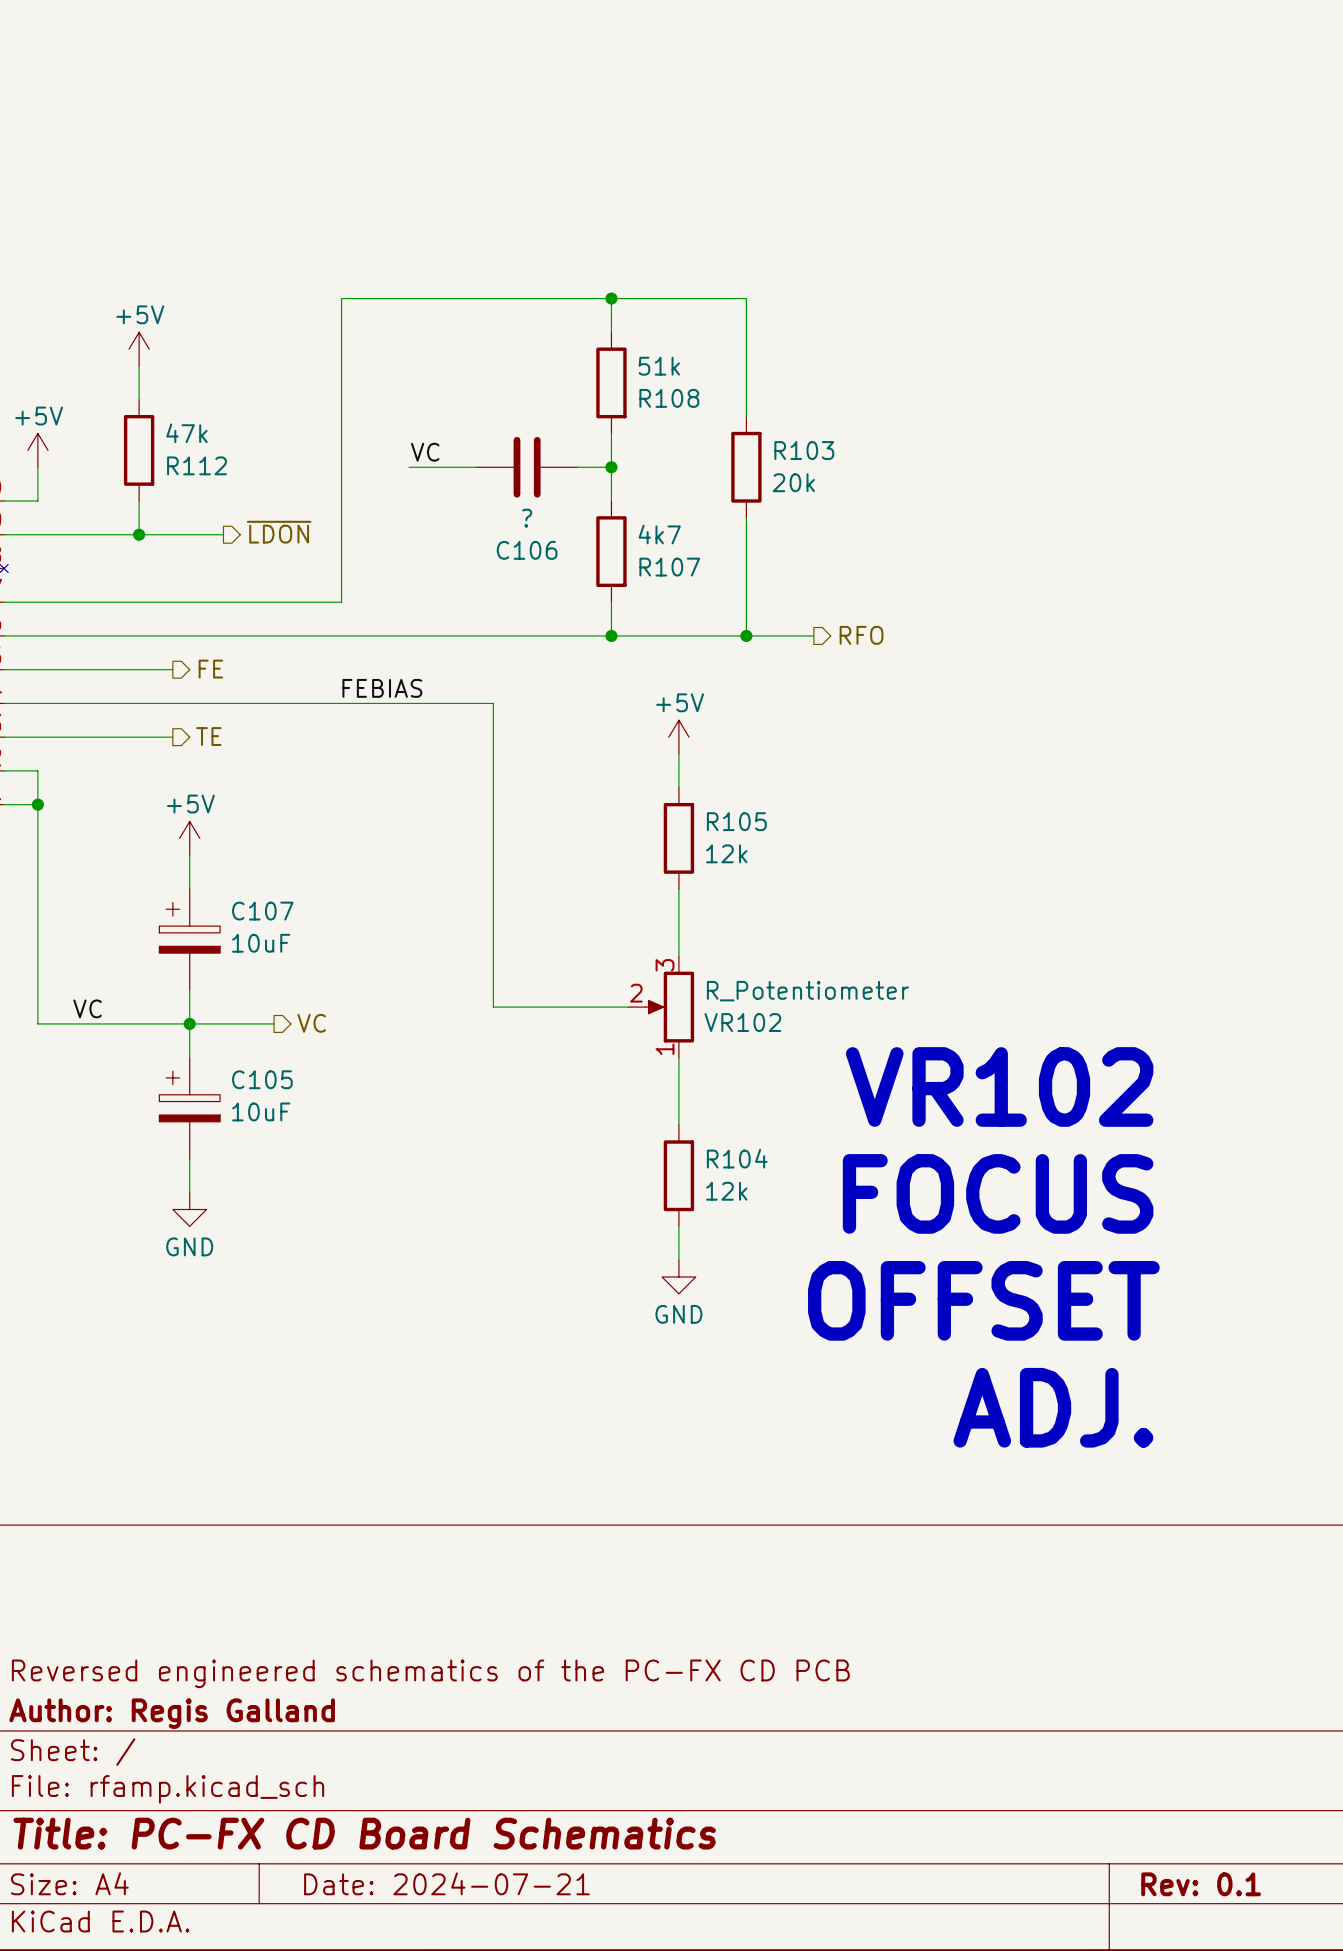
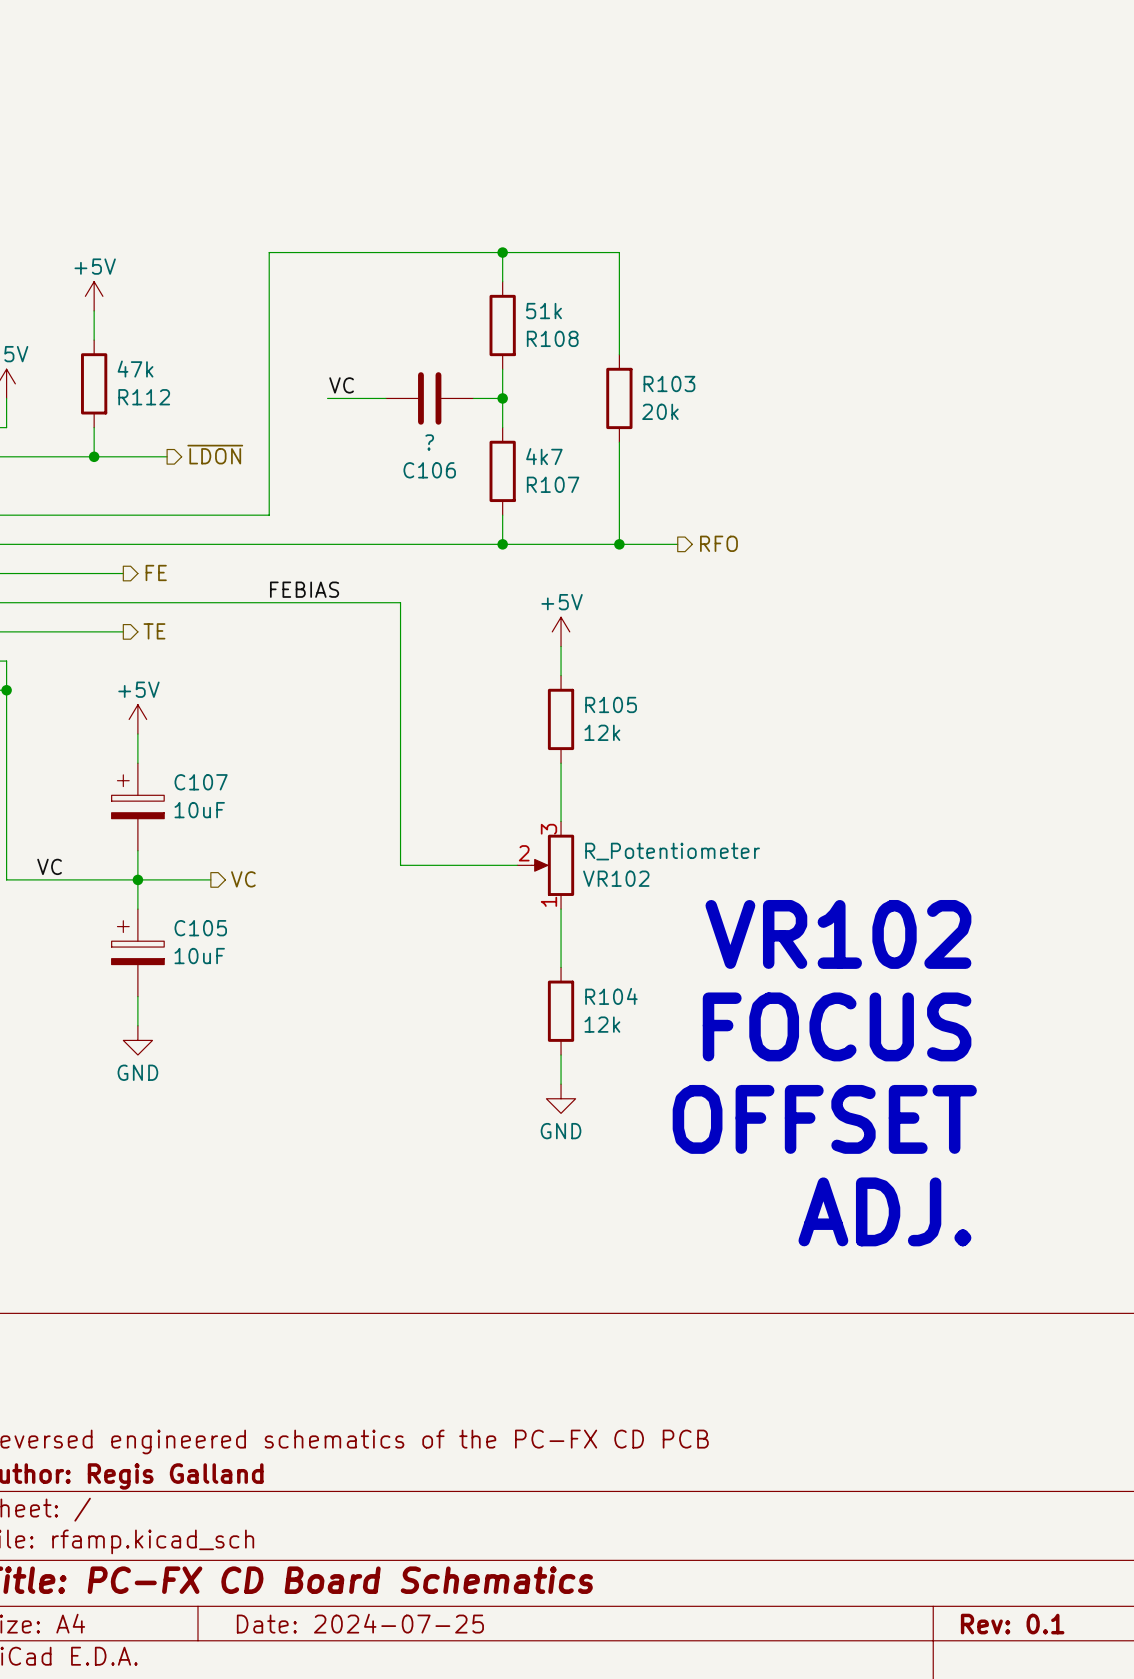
title block: Date: 2024-07-21 (446, 1883) -> Date: 2024-07-25 (360, 1623)

